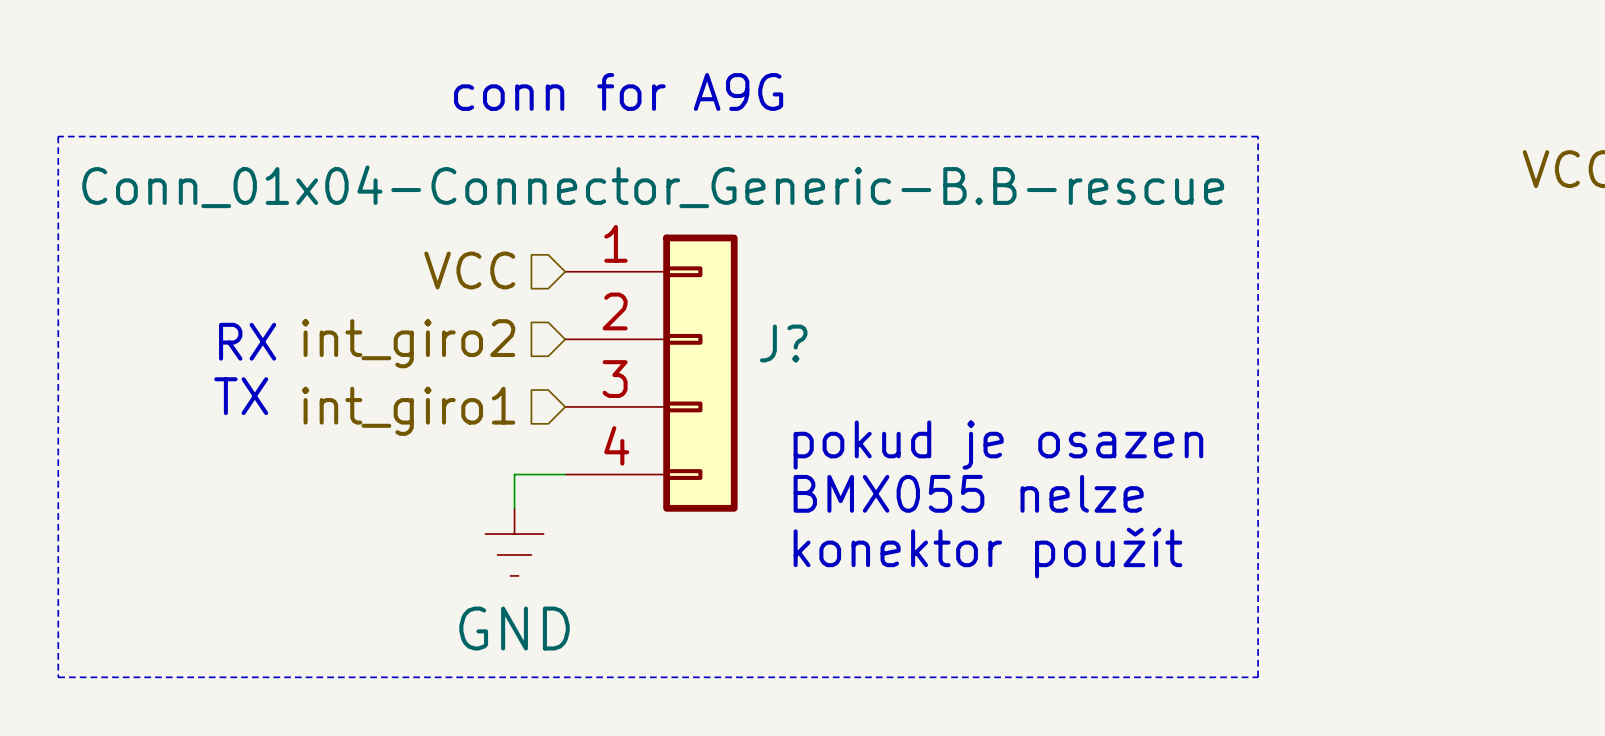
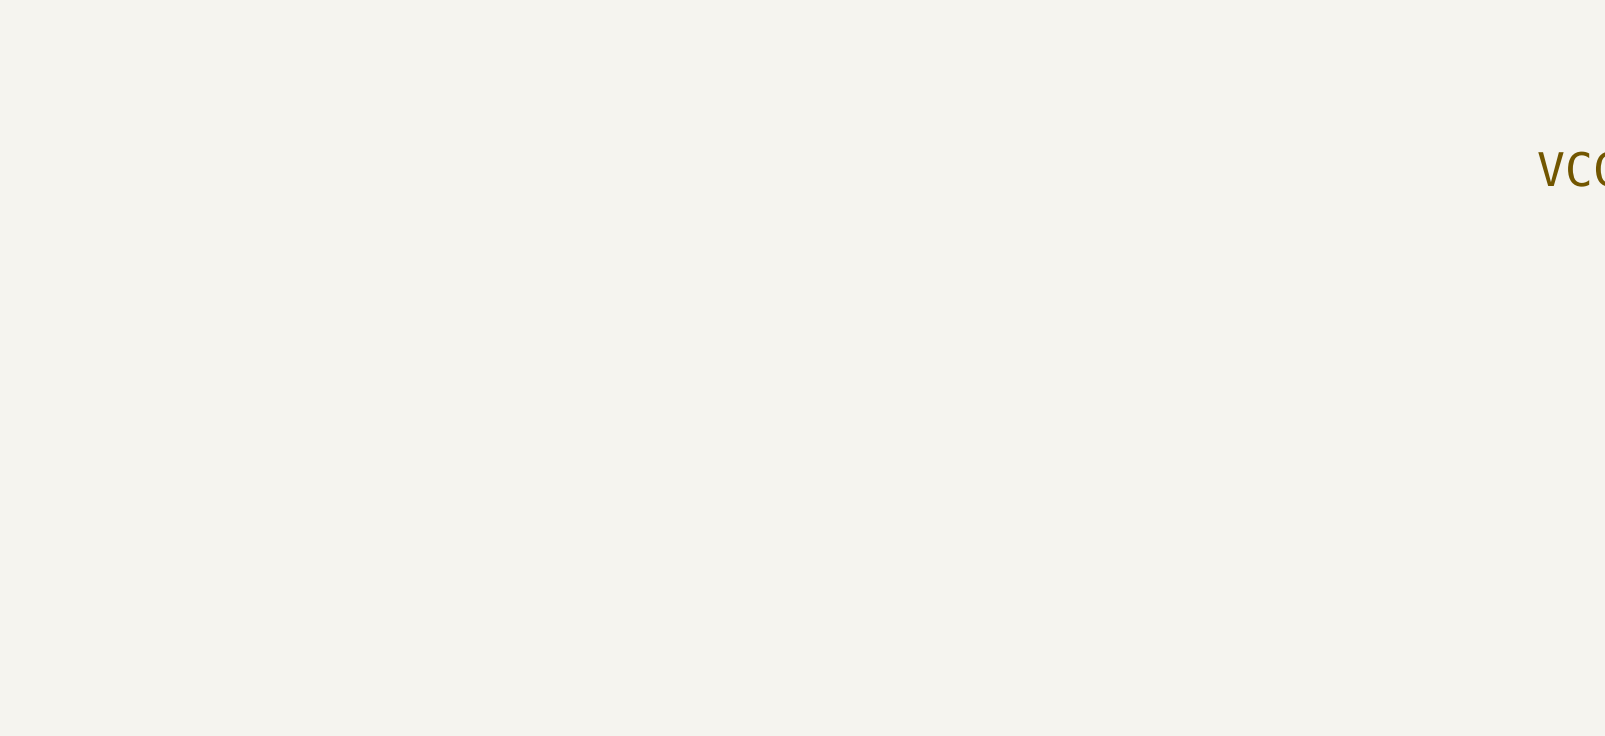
text: conn for A9G (618, 91) -> none
line: (58, 136) (1258, 136) (1258, 677) (58, 677) (58, 136) -> none
hierarchical label: VCC (469, 270) -> none
text: RX (247, 341) -> none
hierarchical label: int_giro2 (408, 343) -> none
J?: Conn_01x04-Connector_Generic-B.B-rescue (651, 373) -> none
text: TX (241, 396) -> none
hierarchical label: int_giro1 (408, 411) -> none
text: pokud je osazen (998, 445) -> none
wire: (565, 474) (514, 474) (514, 508) -> none
text: BMX055 nelze (968, 493) -> none
power symbol: GND (514, 542) -> none
text: konektor použít (987, 553) -> none

